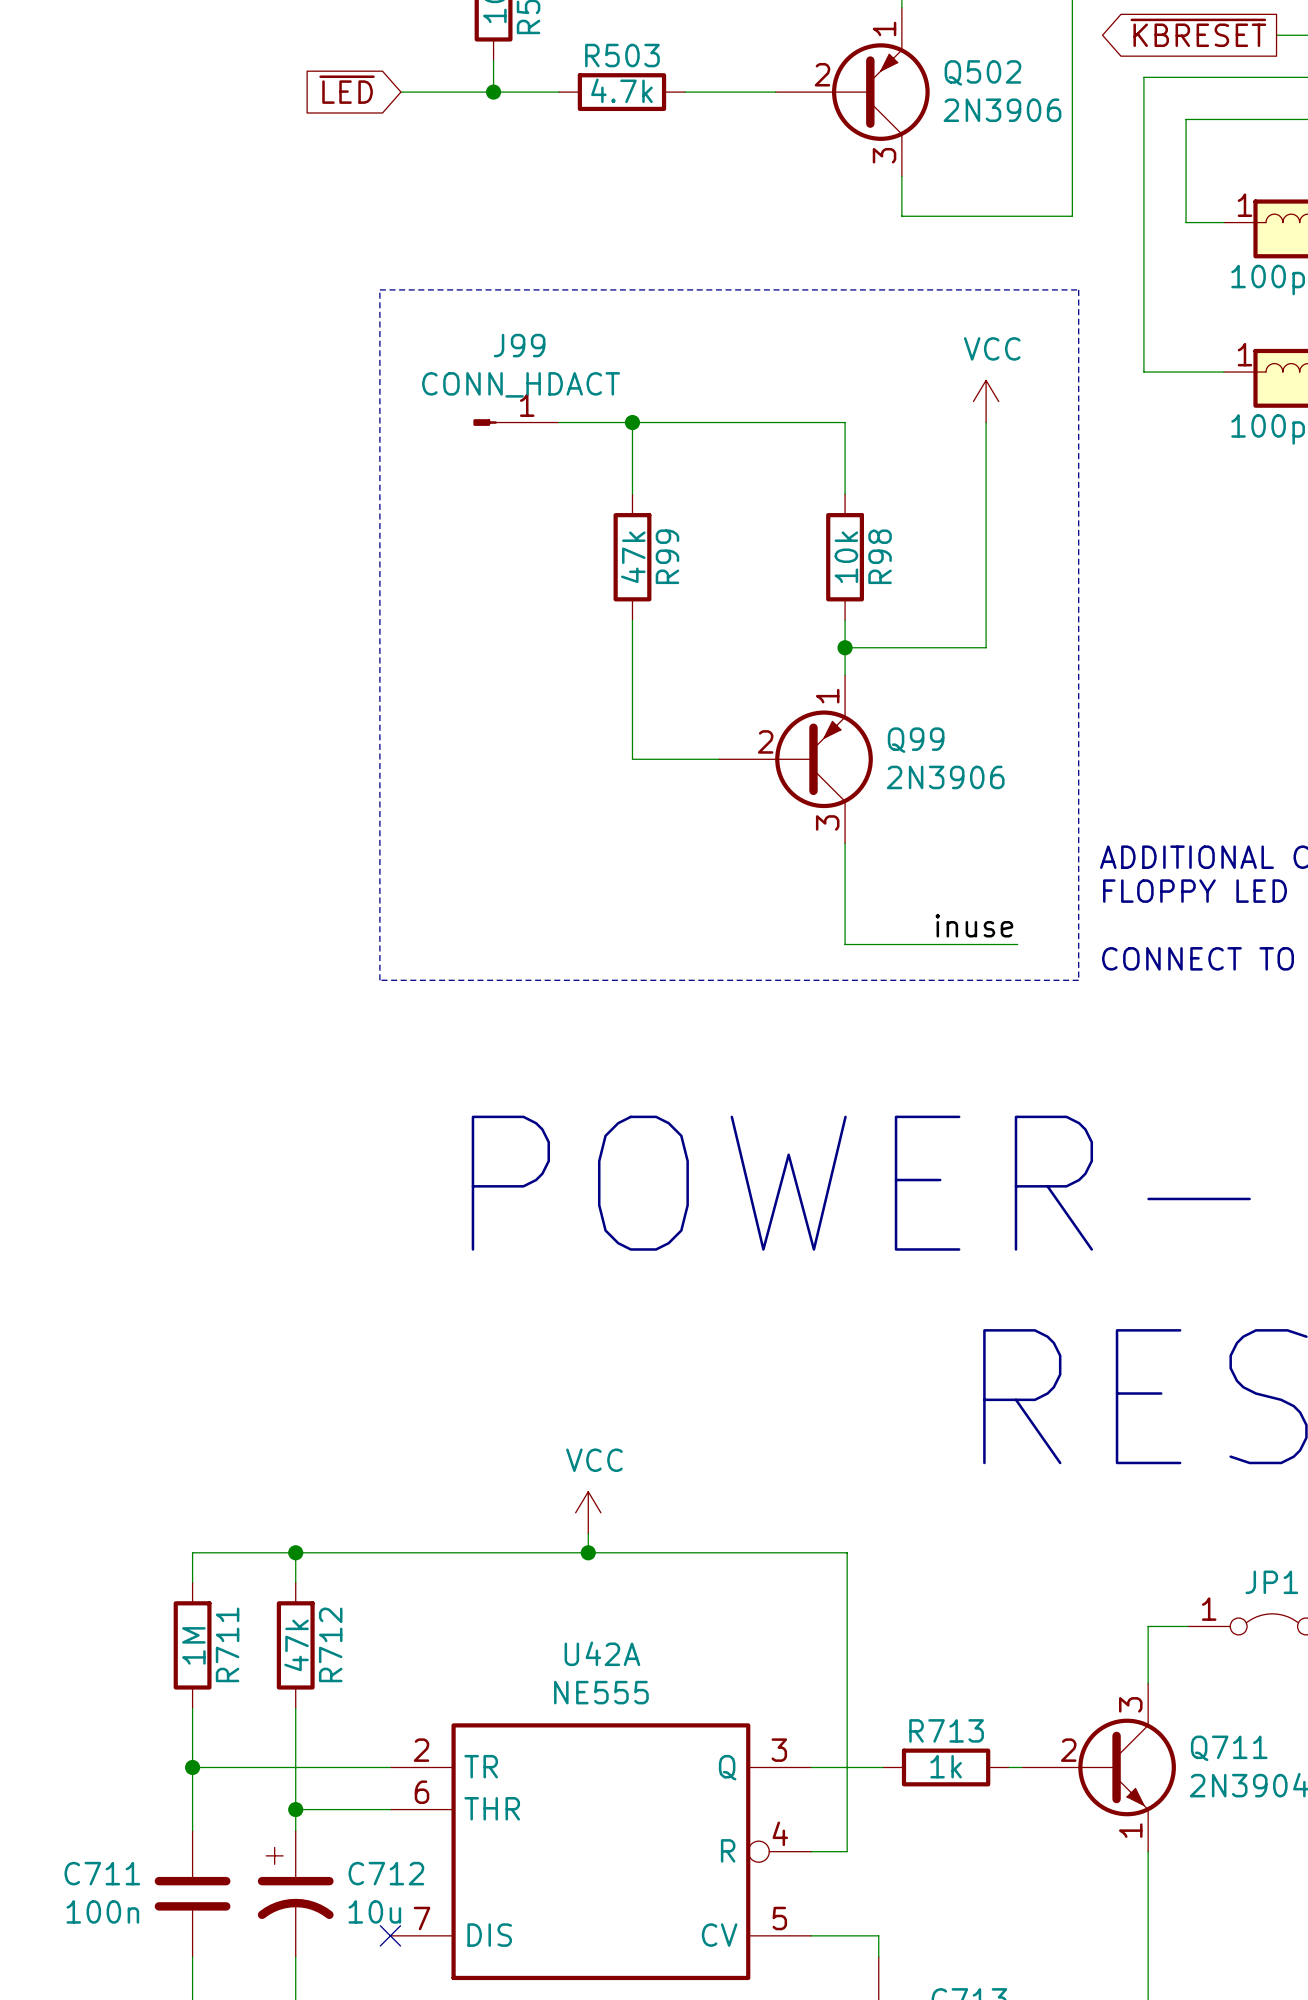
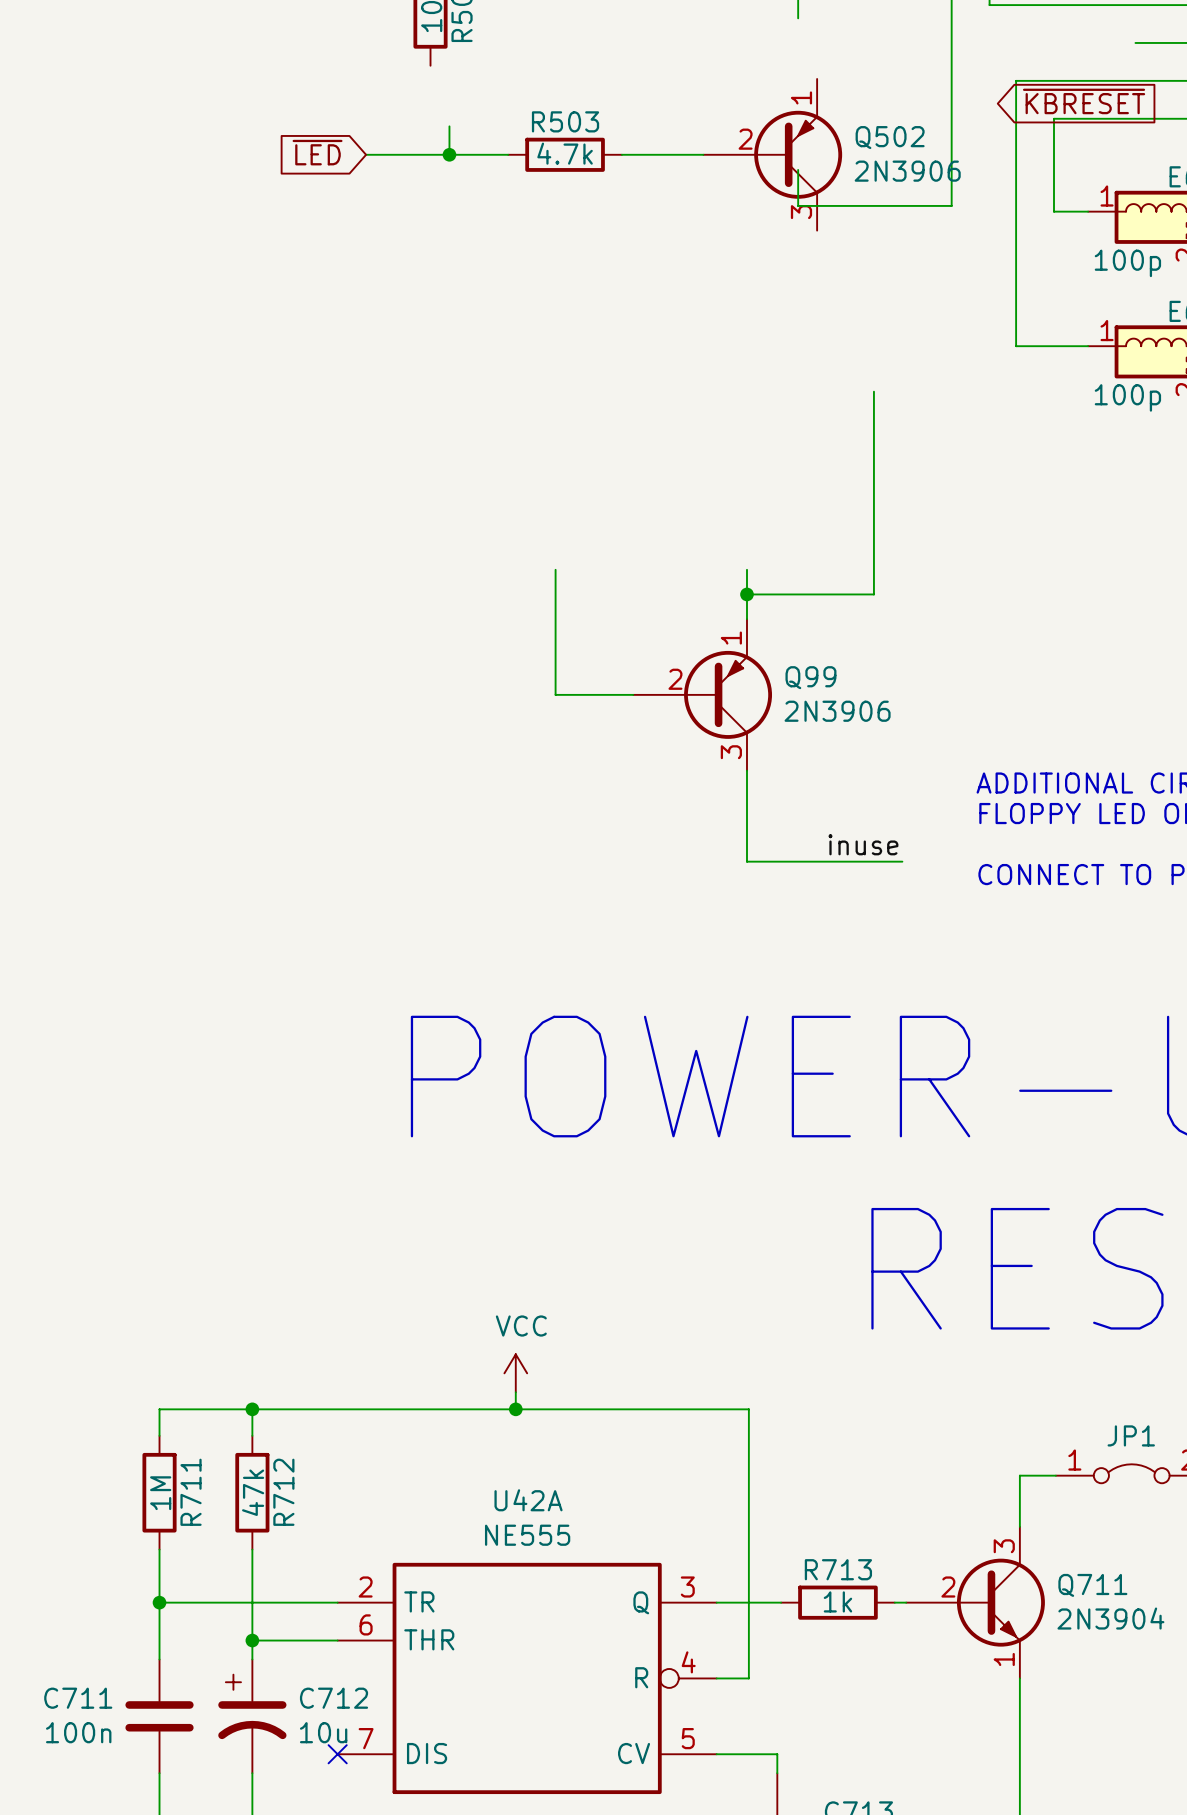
global label position: ~{KBRESET} (1198, 32) -> ~{KBRESET} (1084, 101)
wire: (493, 60) (493, 92) -> (449, 126) (449, 154)
global label position: ~{LED} (347, 89) -> ~{LED} (317, 152)
wire: (400, 92) (558, 92) -> (366, 154) (508, 154)
junction position: (493, 92) -> (449, 154)
R503 position: (621, 92) -> (565, 154)
wire: (685, 92) (775, 92) -> (621, 154) (703, 154)
Q502 position: (852, 92) -> (772, 154)
line: (379, 289) (1078, 289) (1078, 980) (379, 980) (379, 289) -> none
power symbol: VCC (986, 401) -> none
J99: CONN_HDACT (516, 422) -> none
wire: (558, 422) (845, 422) (845, 494) -> none
wire: (632, 422) (632, 494) -> none
junction: (632, 422) -> none
R99: 47k (632, 557) -> none
R98: 10k (845, 557) -> none

